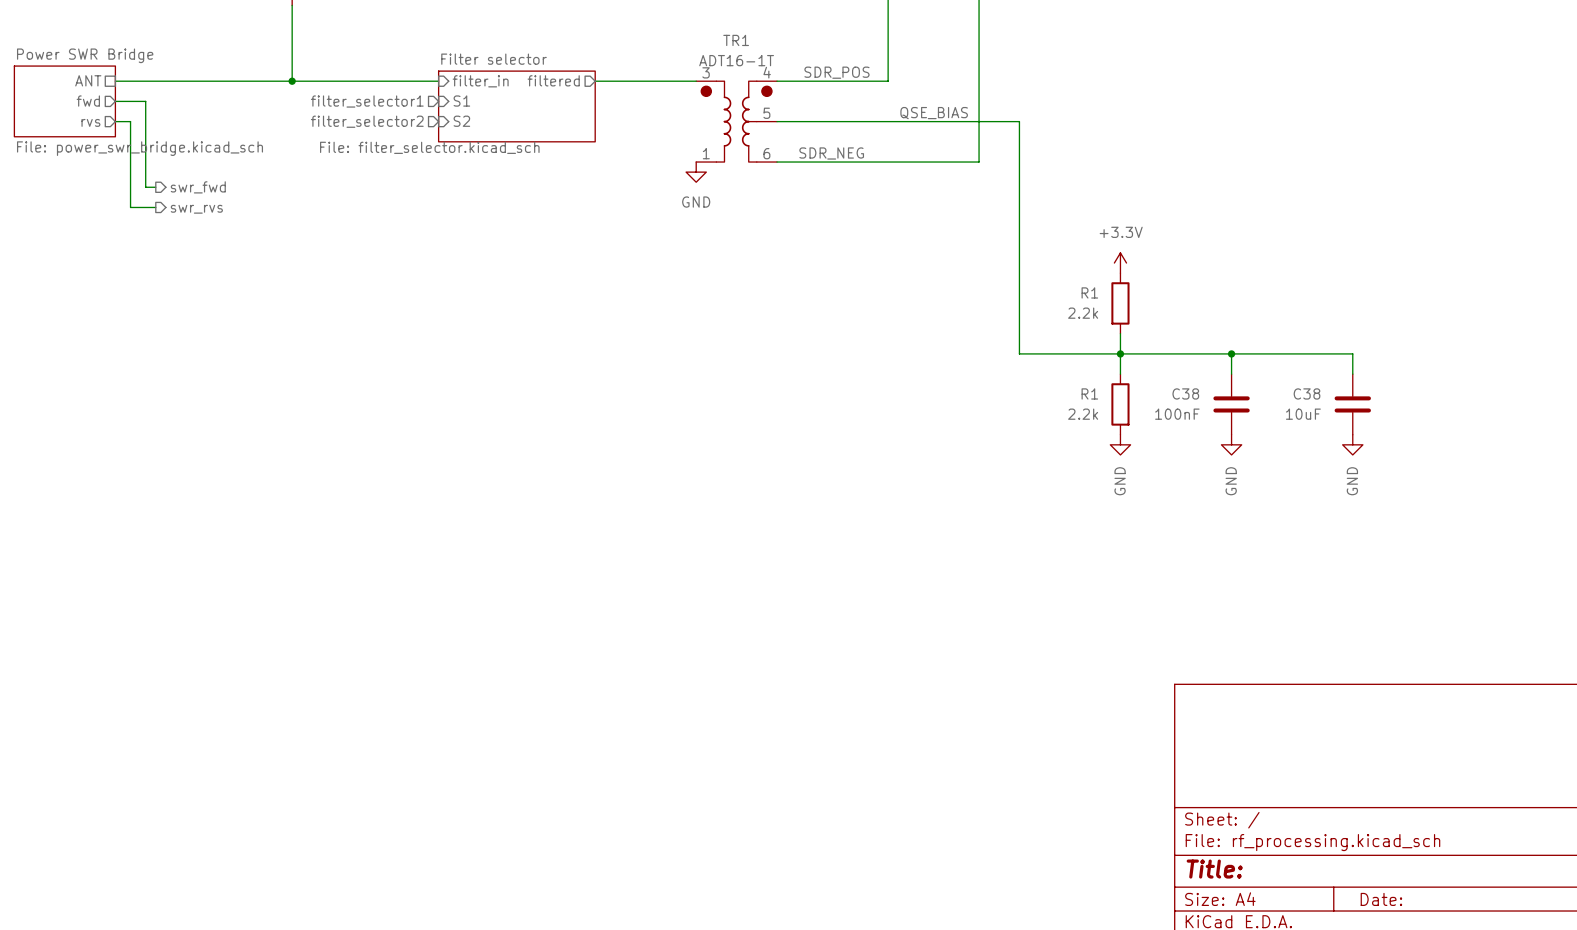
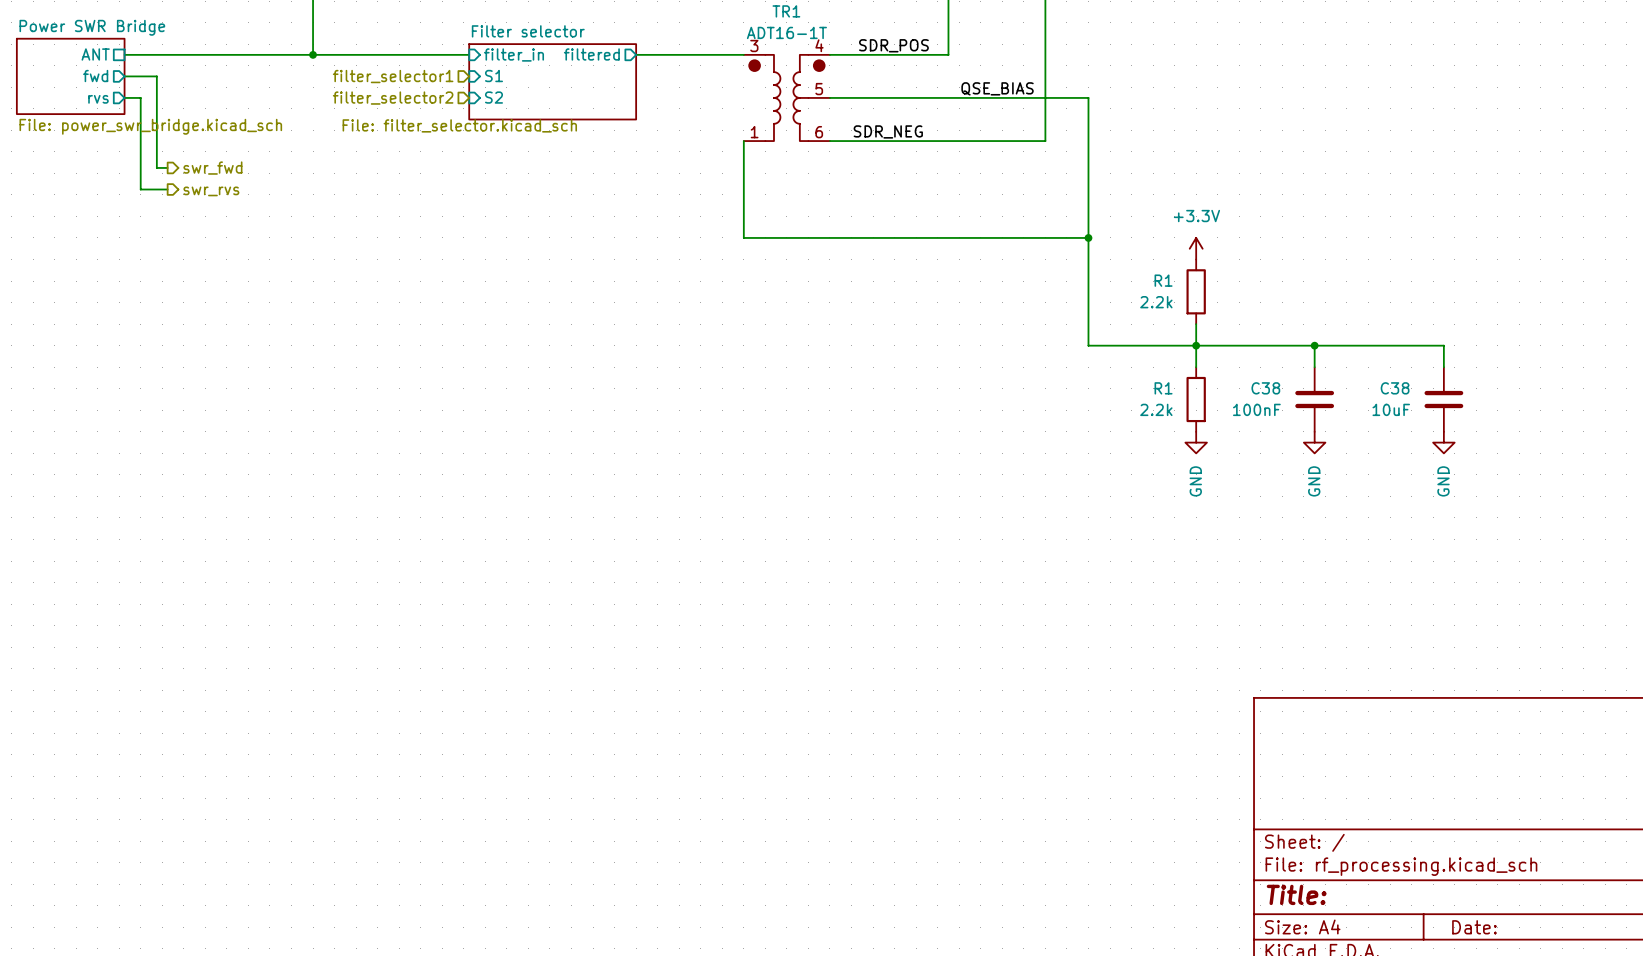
wire: none -> (743, 141) (743, 237) (1088, 237)
power symbol: GND (696, 172) -> none
junction: none -> (1088, 237)

